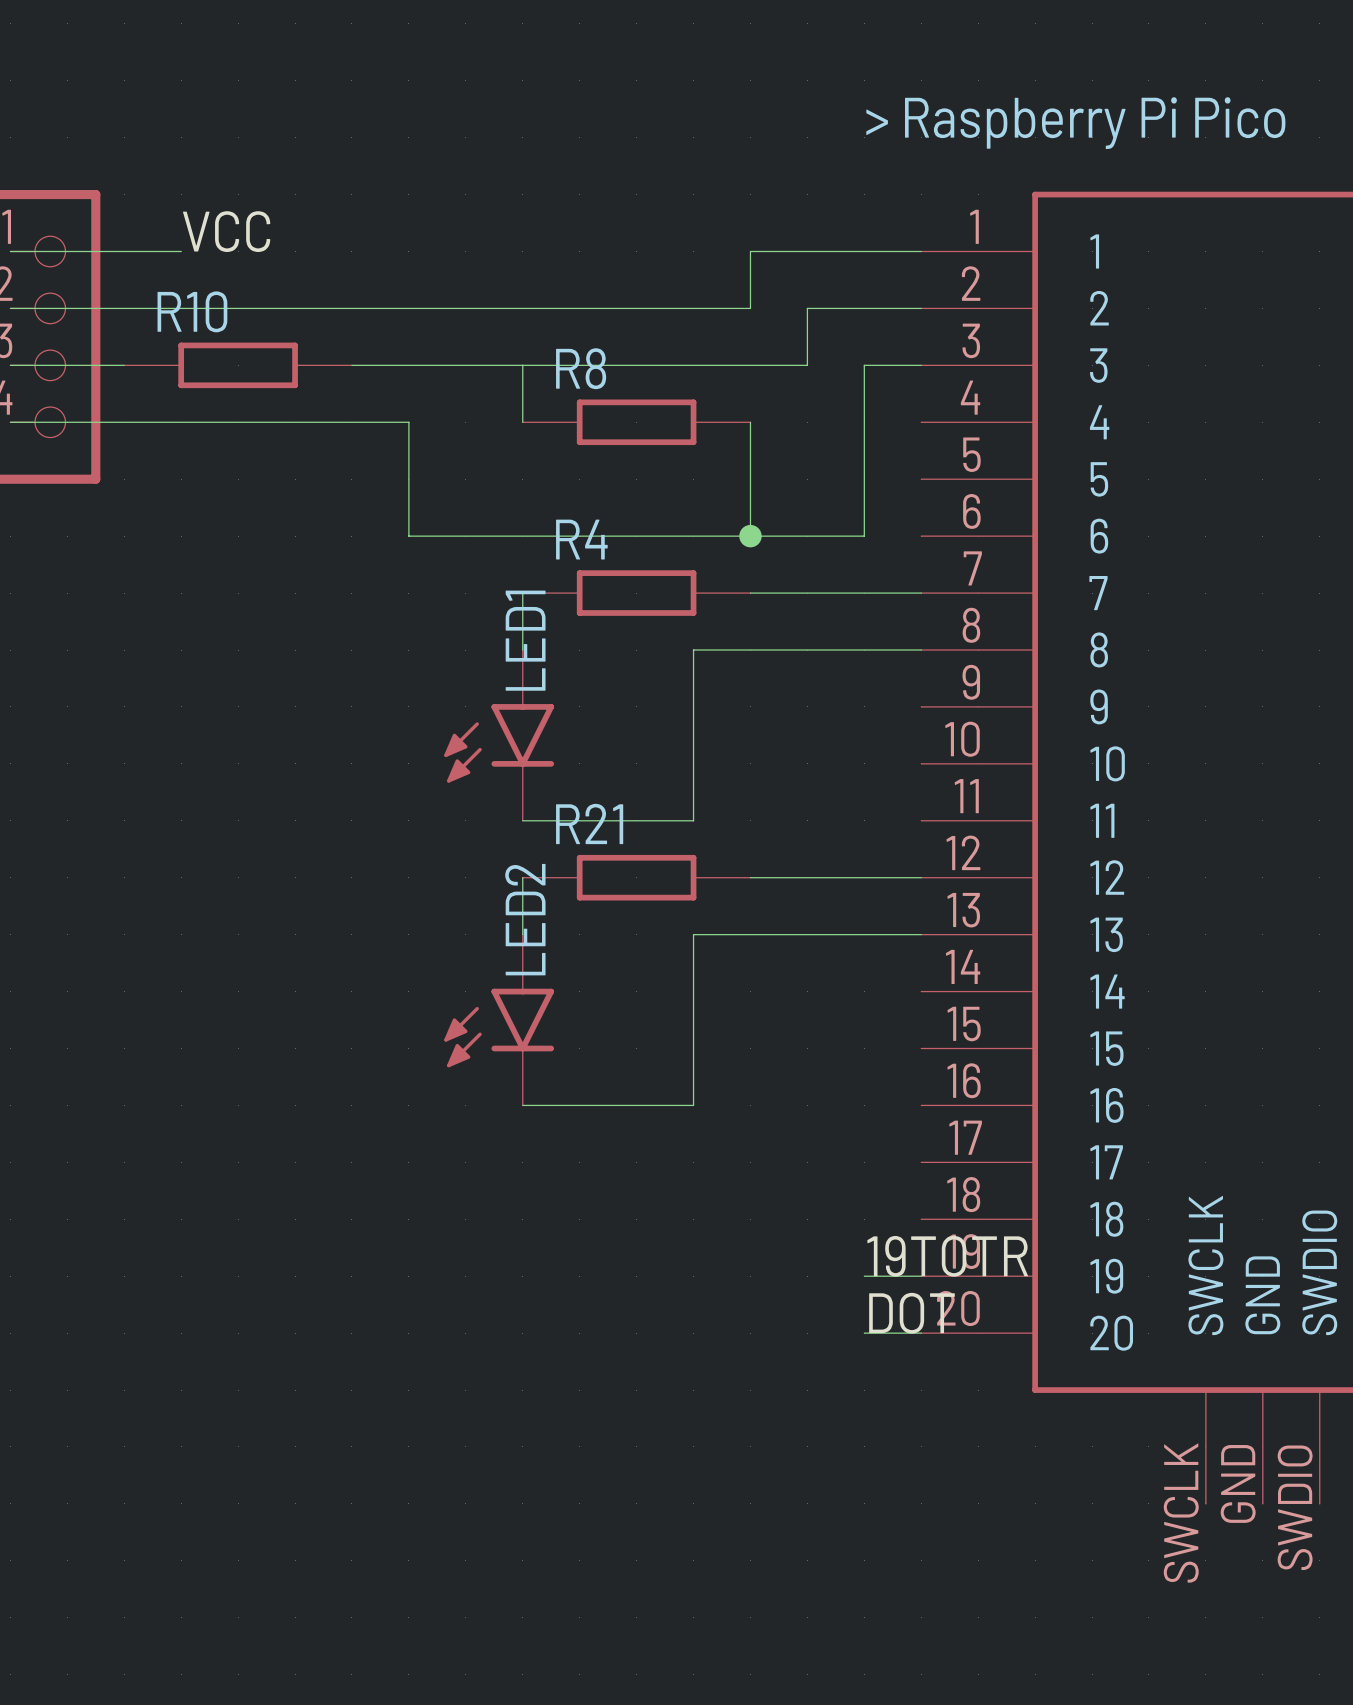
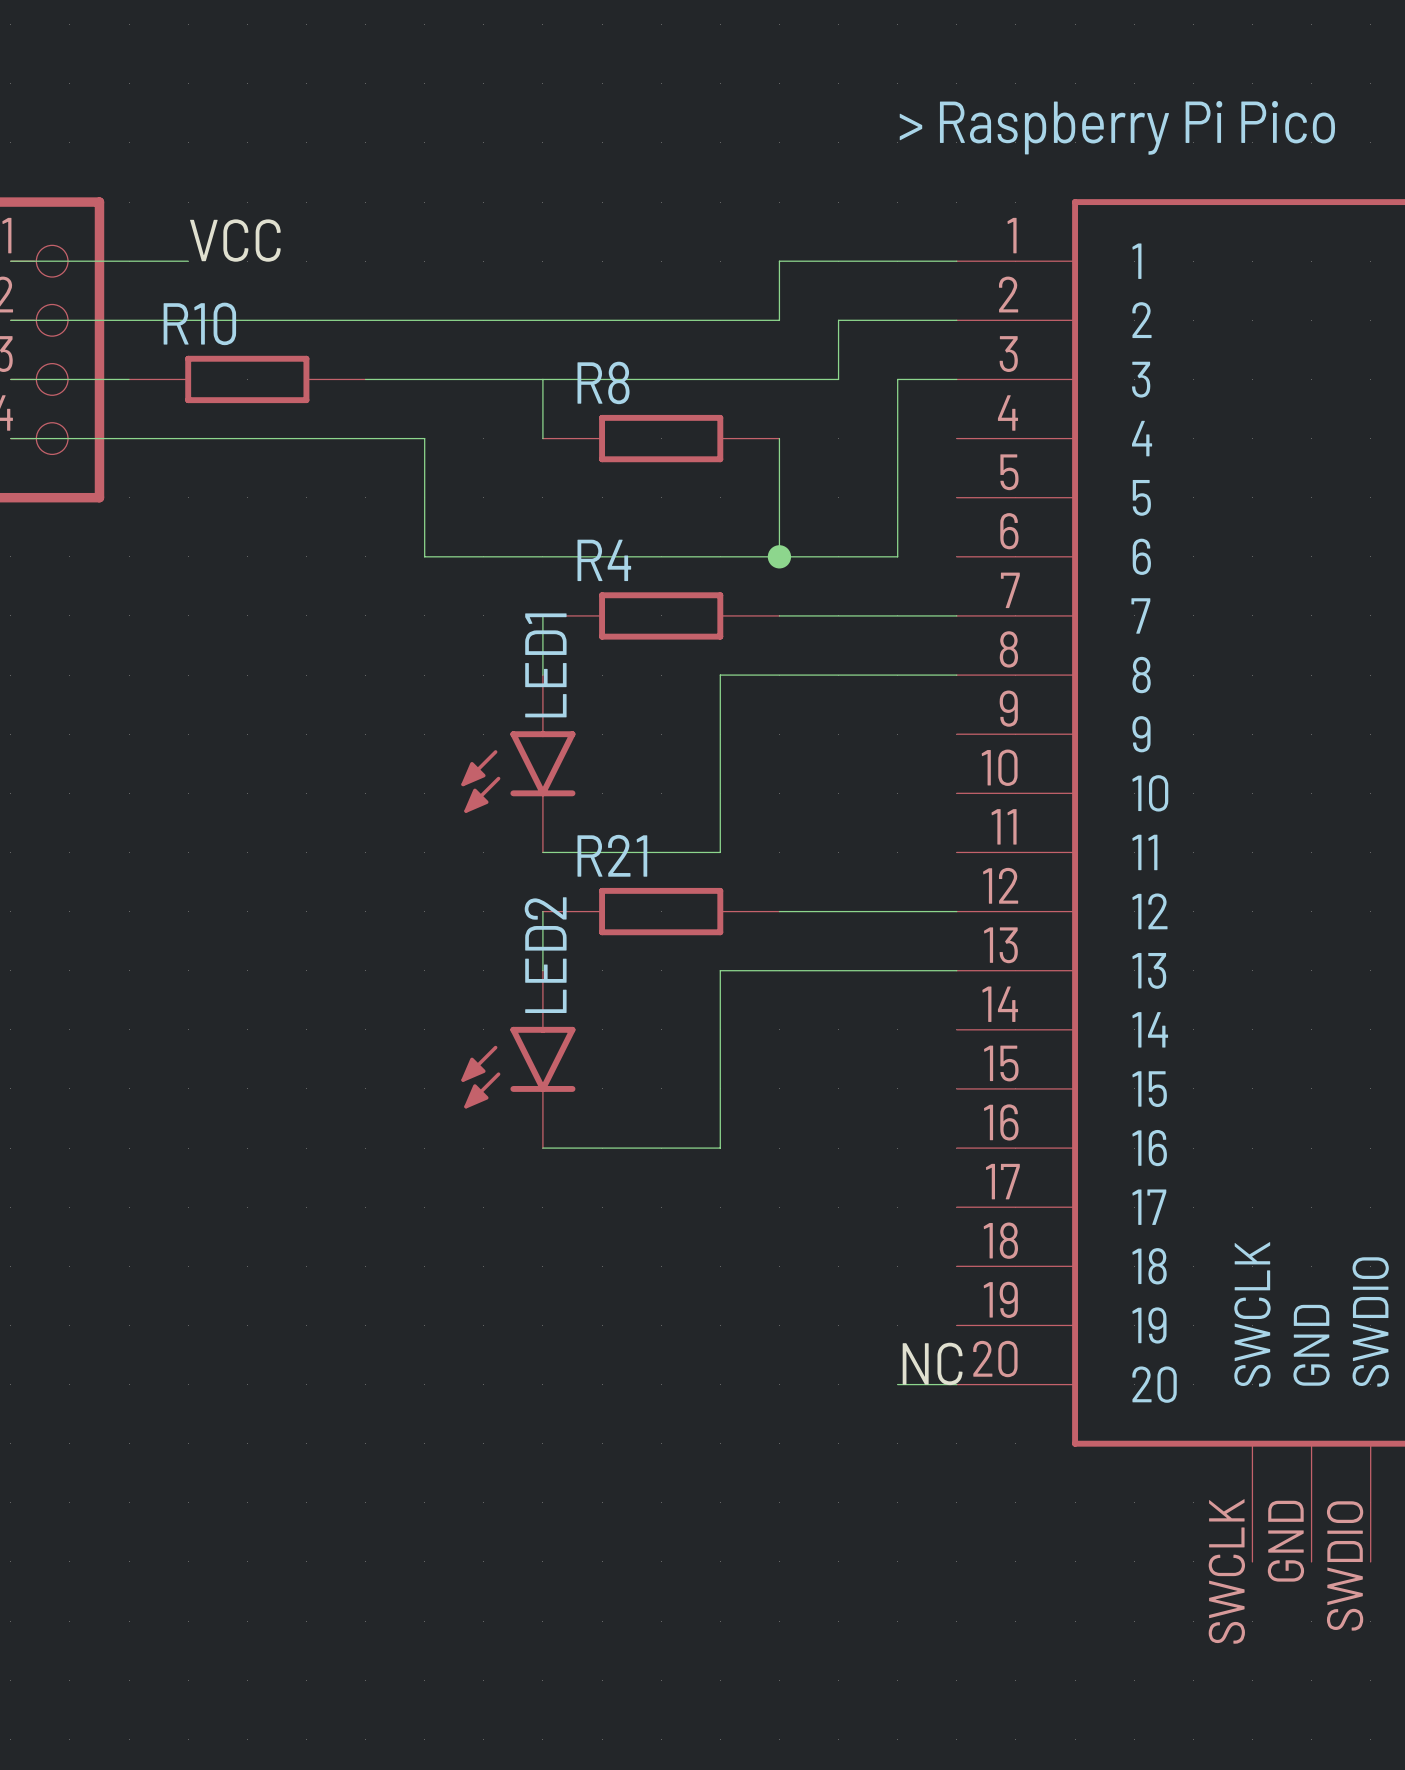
label: 19TOTR (947, 1256) -> none
wire: (864, 1276) (921, 1276) -> none
label: DOT (911, 1313) -> NC (932, 1363)

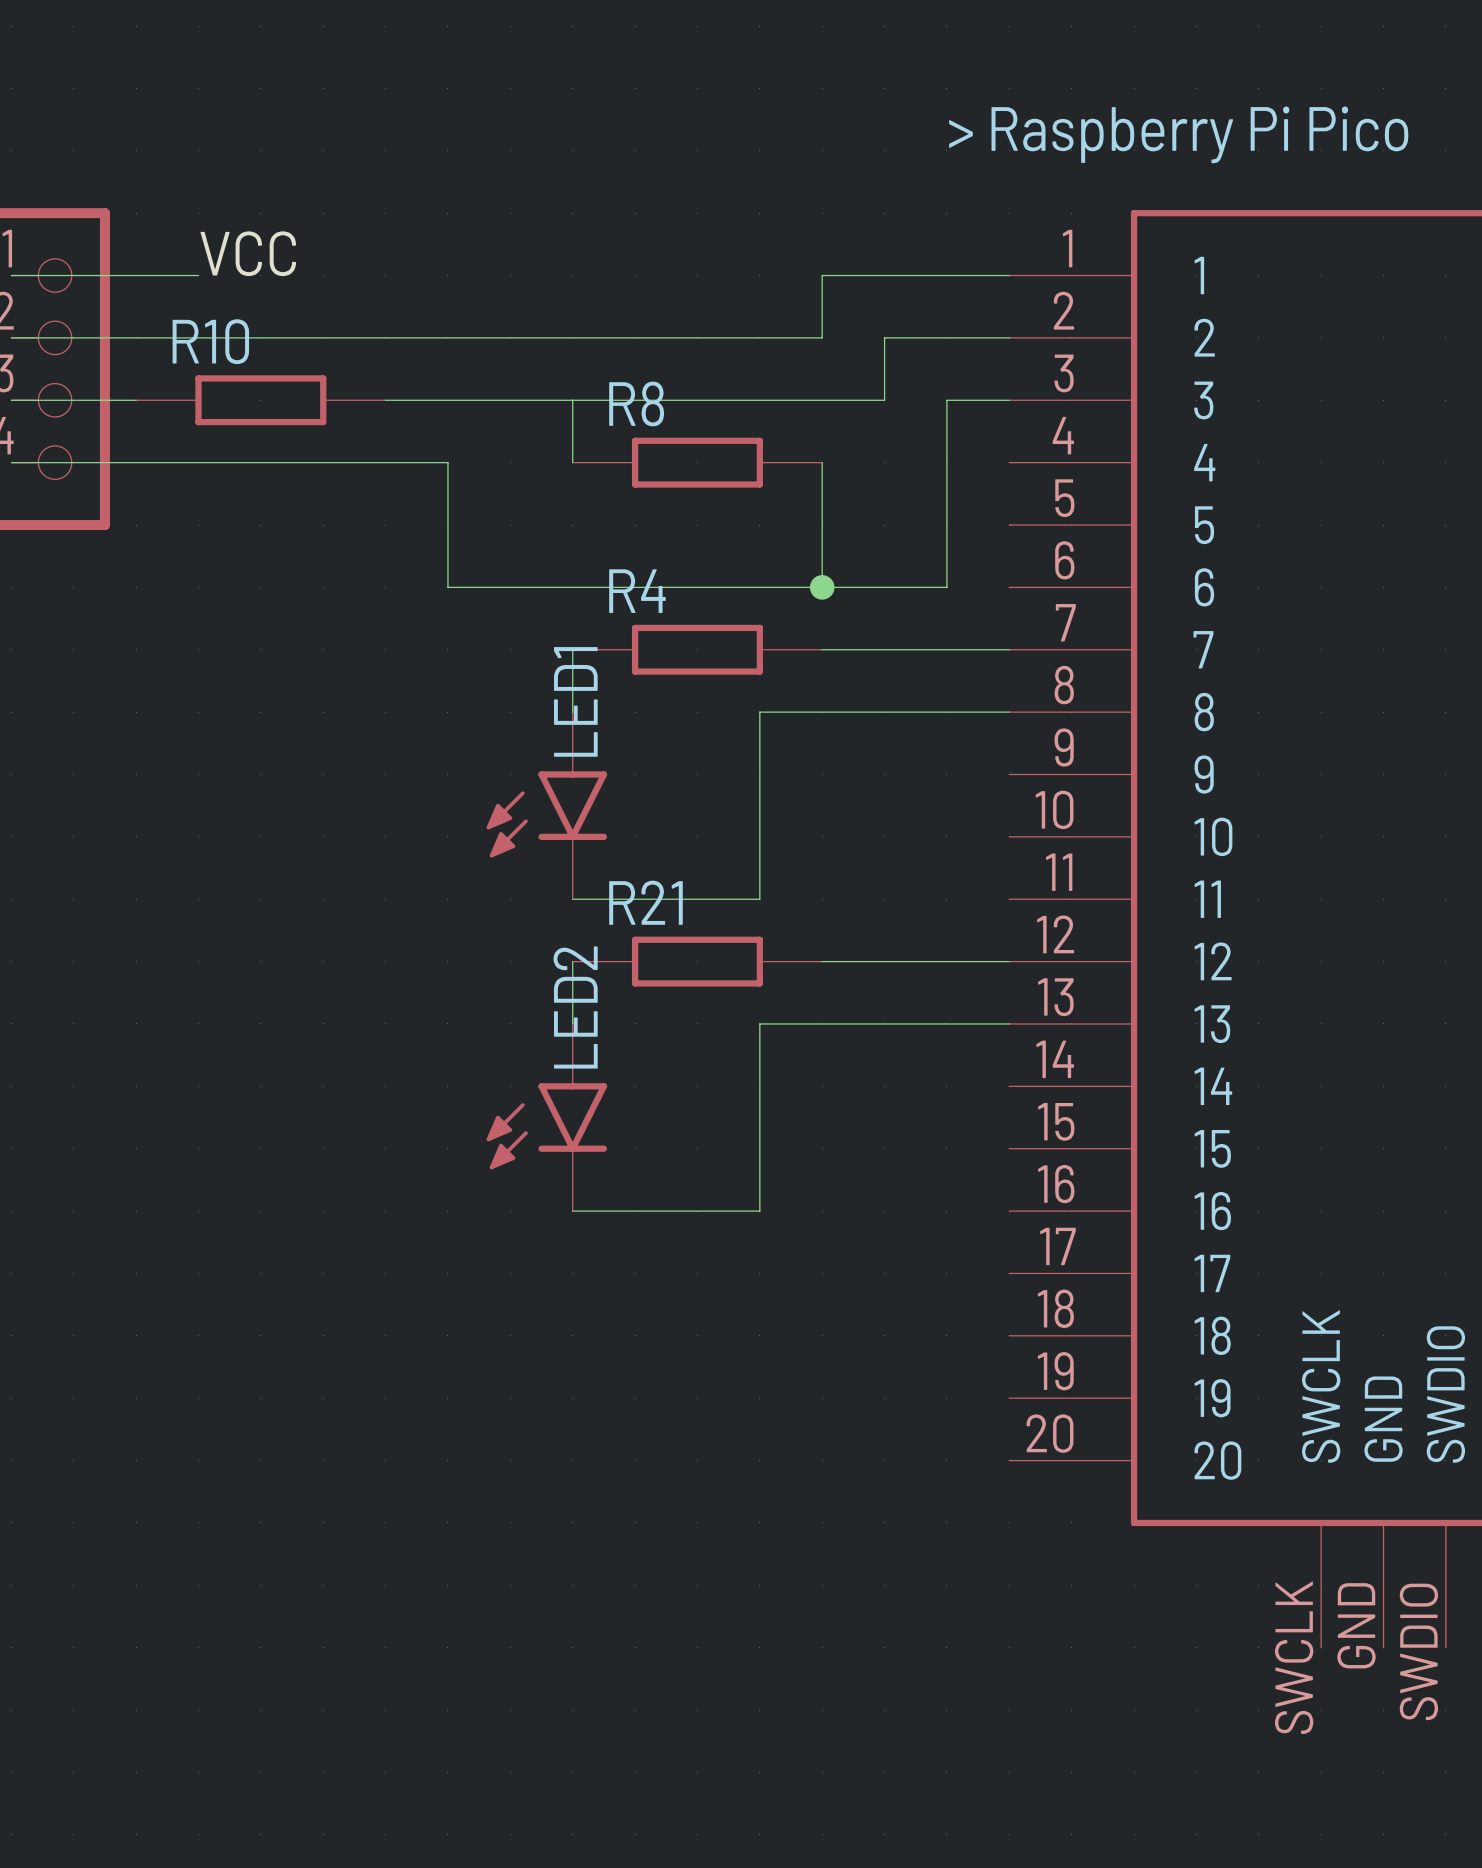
label: NC (932, 1363) -> none
wire: (897, 1384) (956, 1384) -> none

